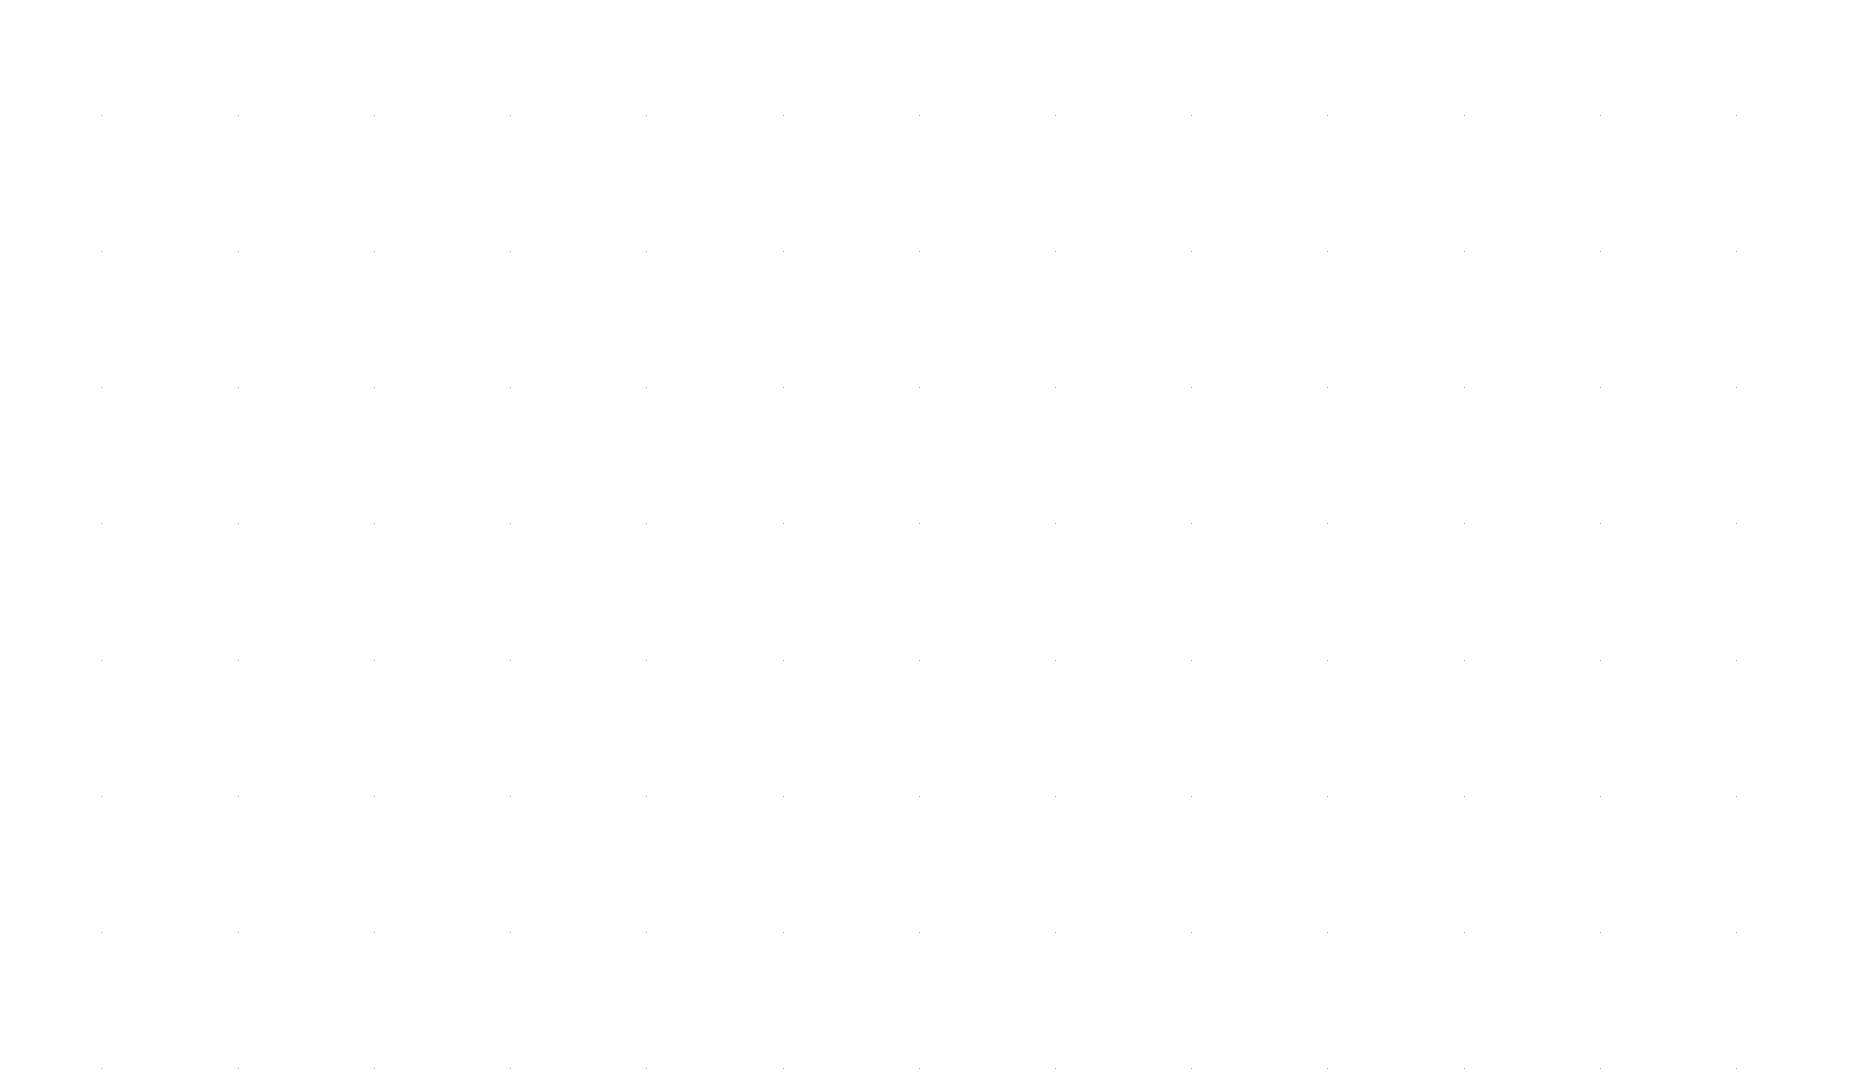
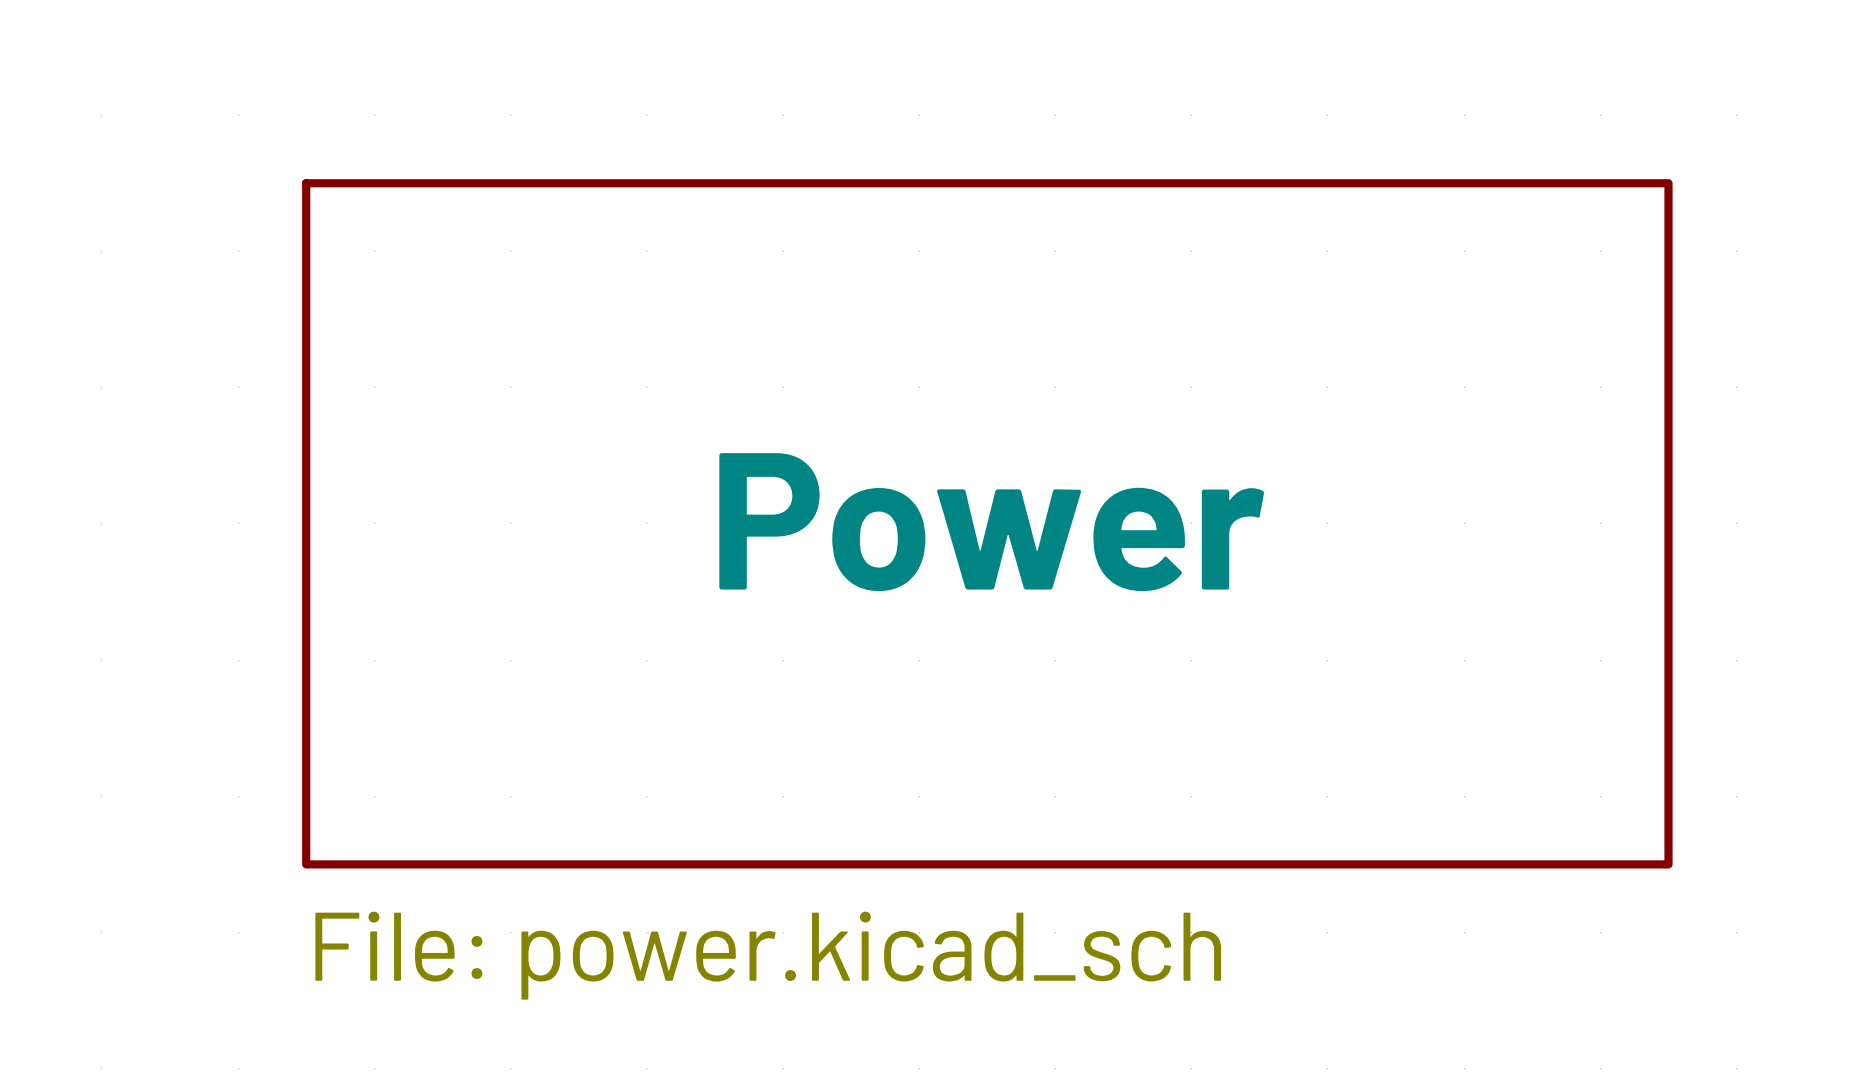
sheet Power: none -> File: power.kicad_sch (987, 523)

